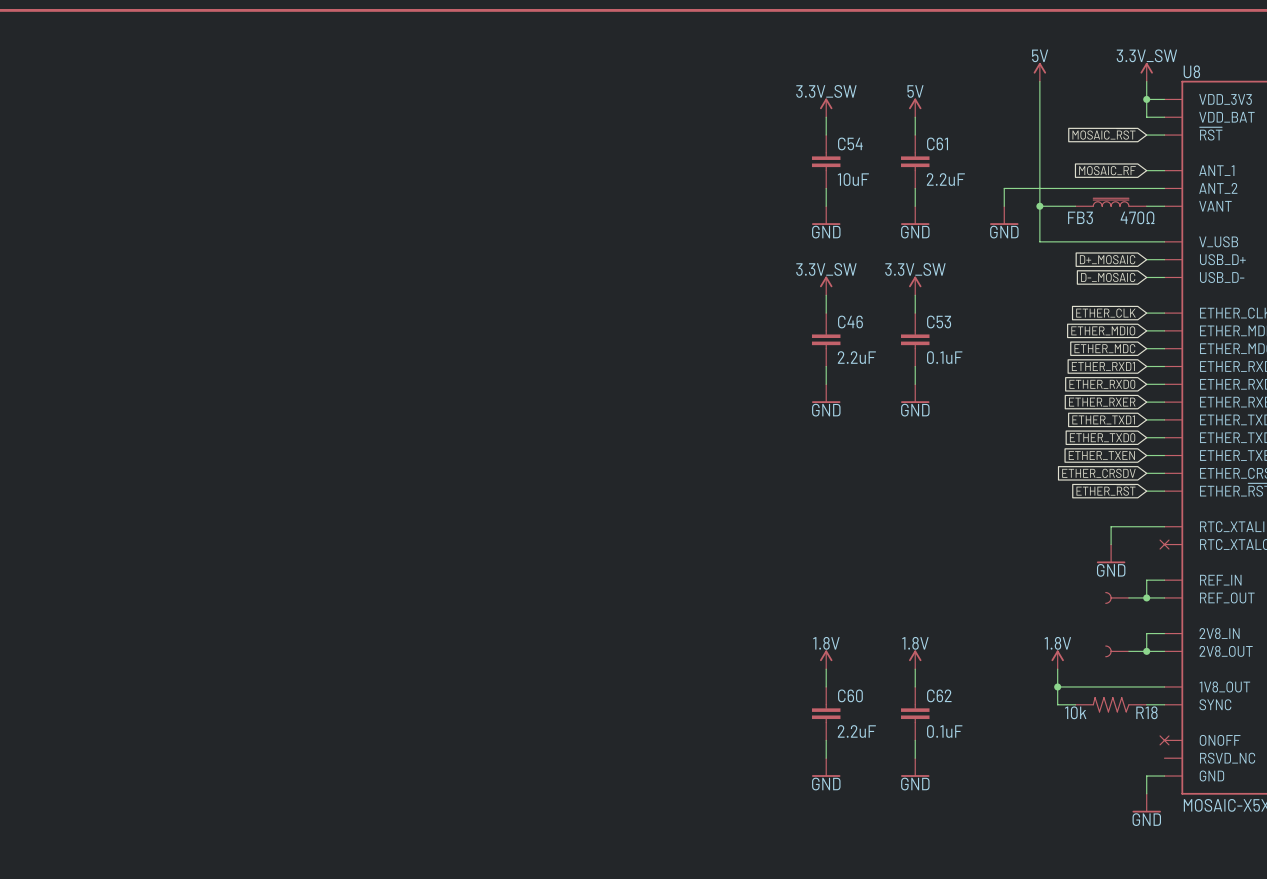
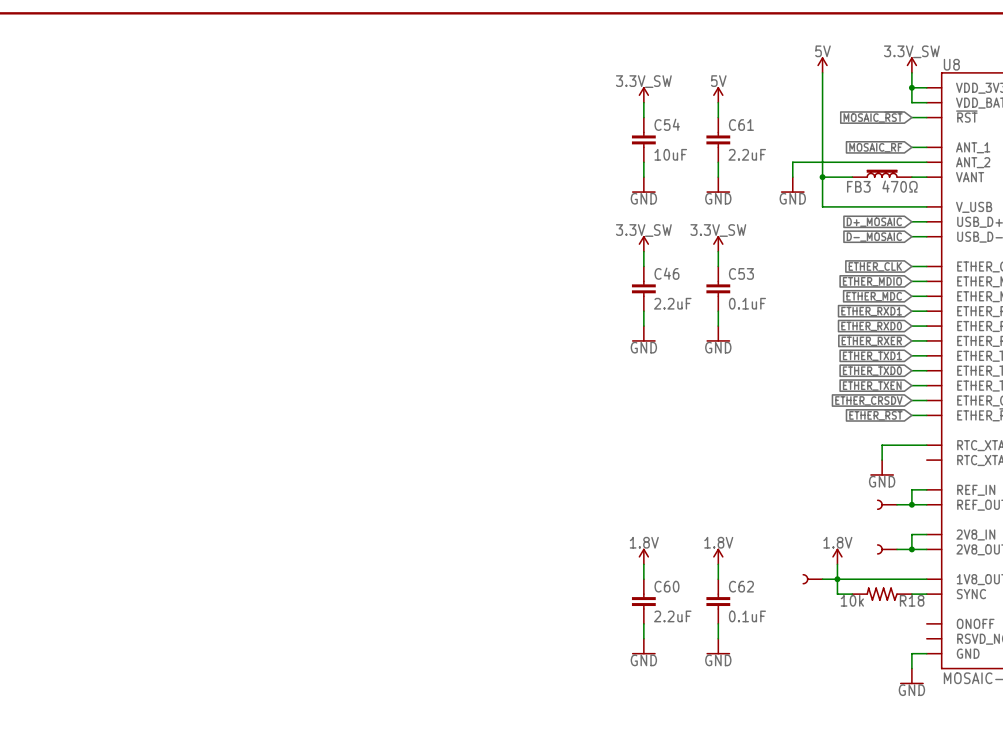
line: (1160, 540) (1168, 549) -> none
line: (1168, 540) (1160, 549) -> none
part: none -> (812, 579)
wire: none -> (822, 579) (837, 579)
line: (1160, 735) (1168, 744) -> none
line: (1168, 735) (1160, 744) -> none

